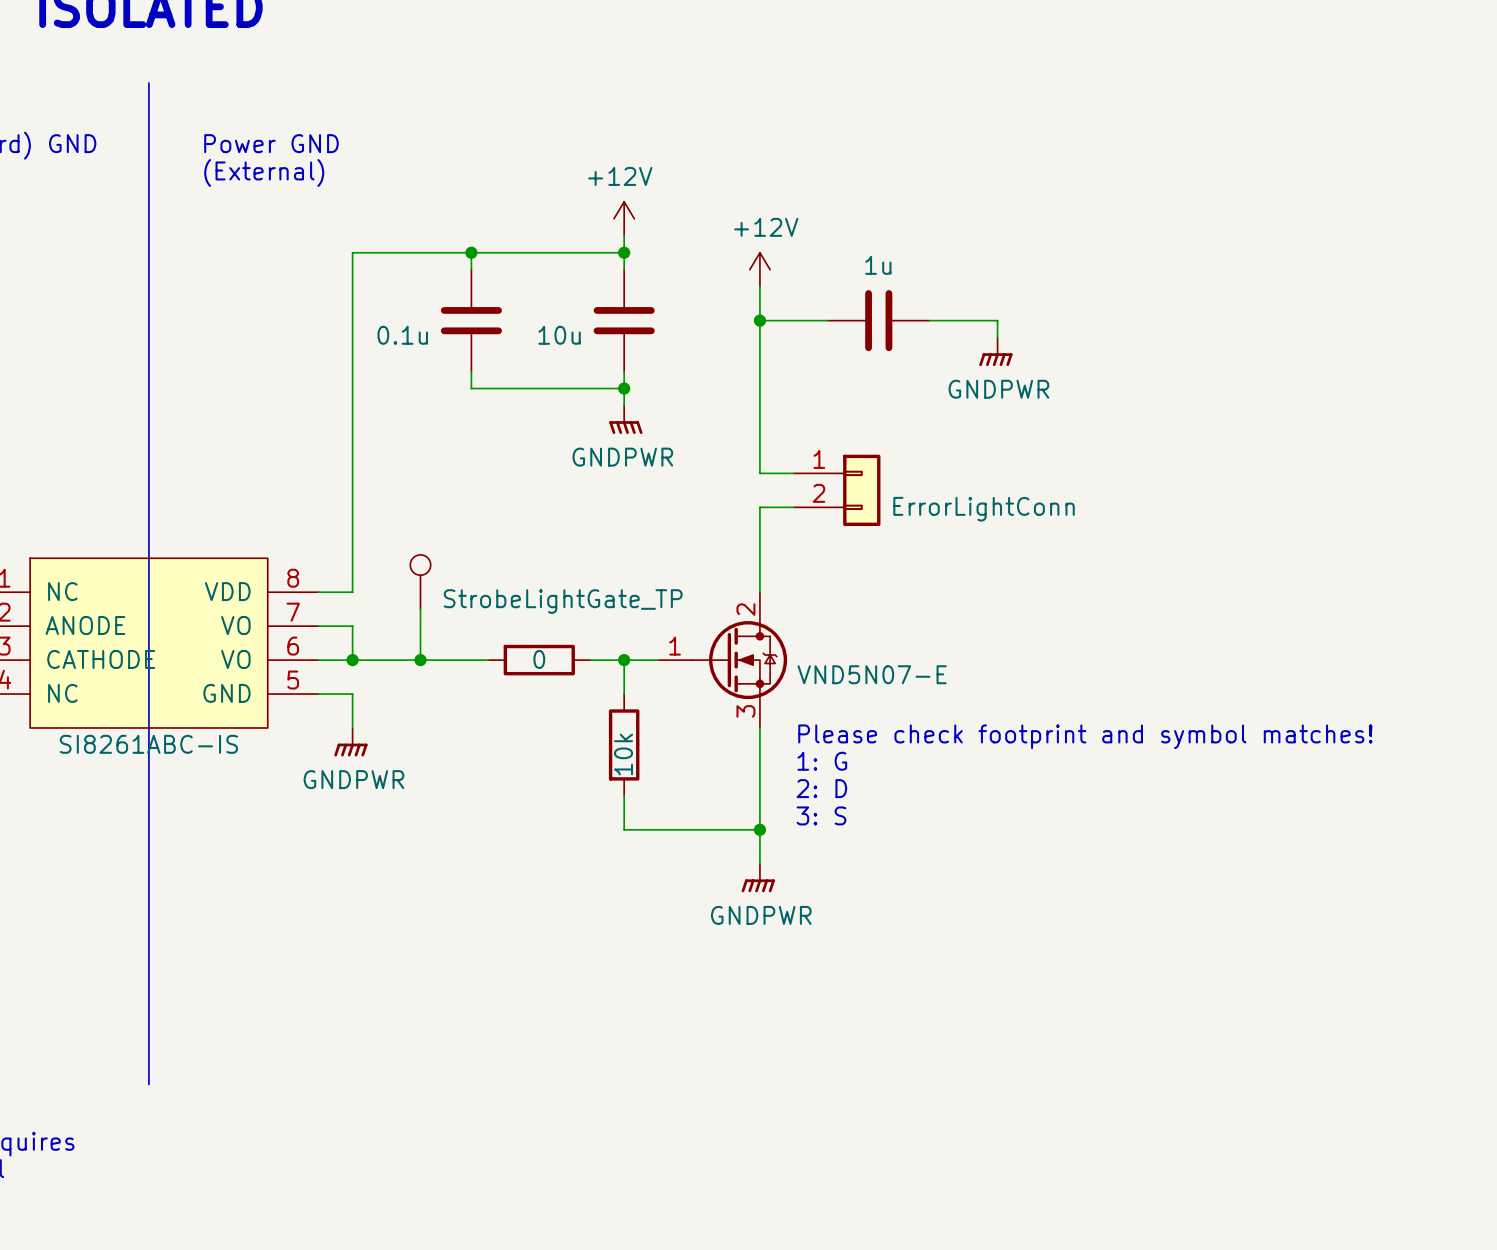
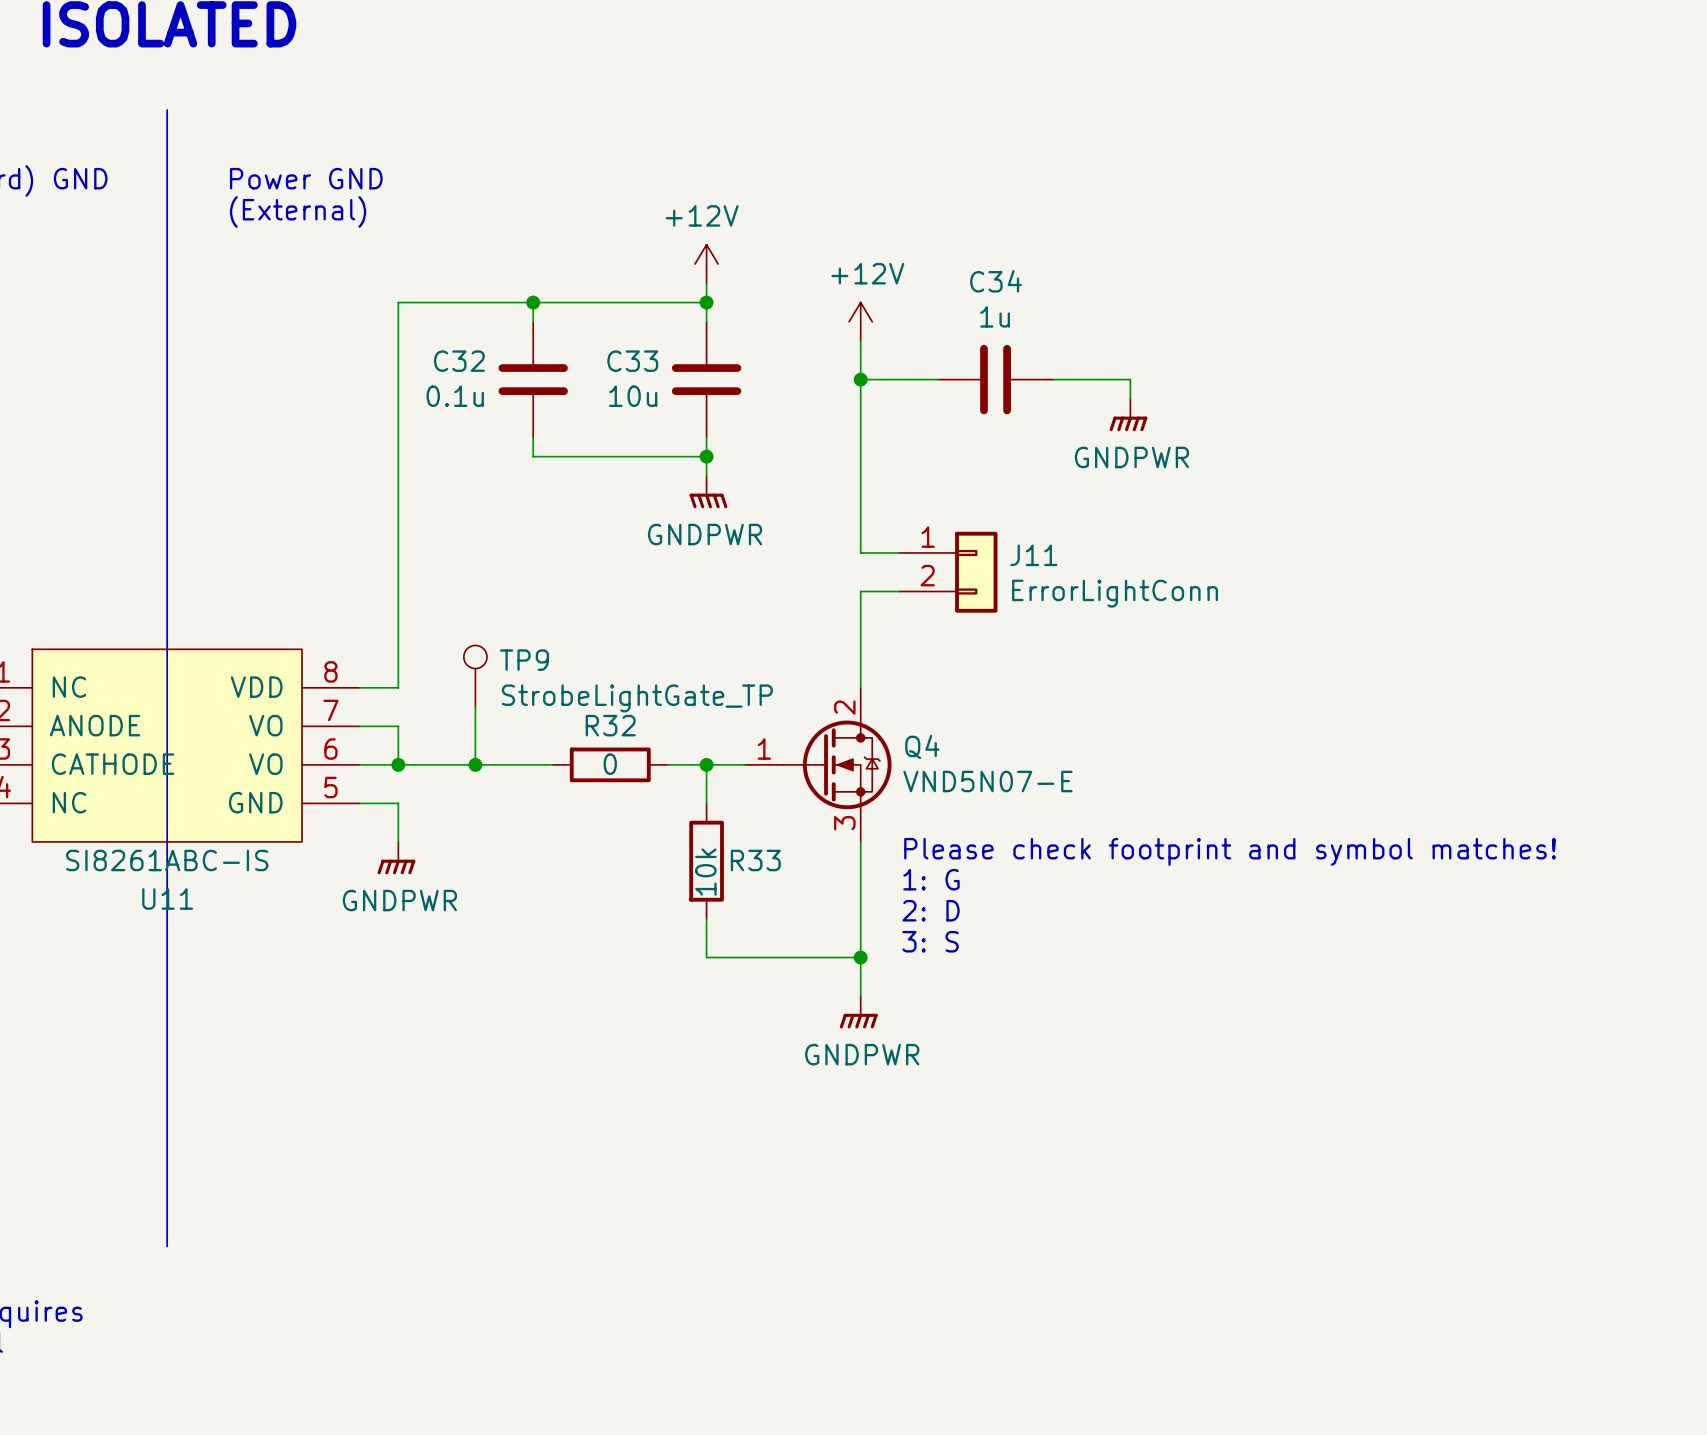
C34 name: none -> C34 (996, 281)
C32 name: none -> C32 (459, 361)
C33 name: none -> C33 (632, 361)
J11 name: none -> J11 (1033, 555)
TP9 name: none -> TP9 (524, 660)
R32 name: none -> R32 (610, 725)
Q4 name: none -> Q4 (922, 746)
R33 name: none -> R33 (755, 860)
U11 name: none -> U11 (167, 899)

